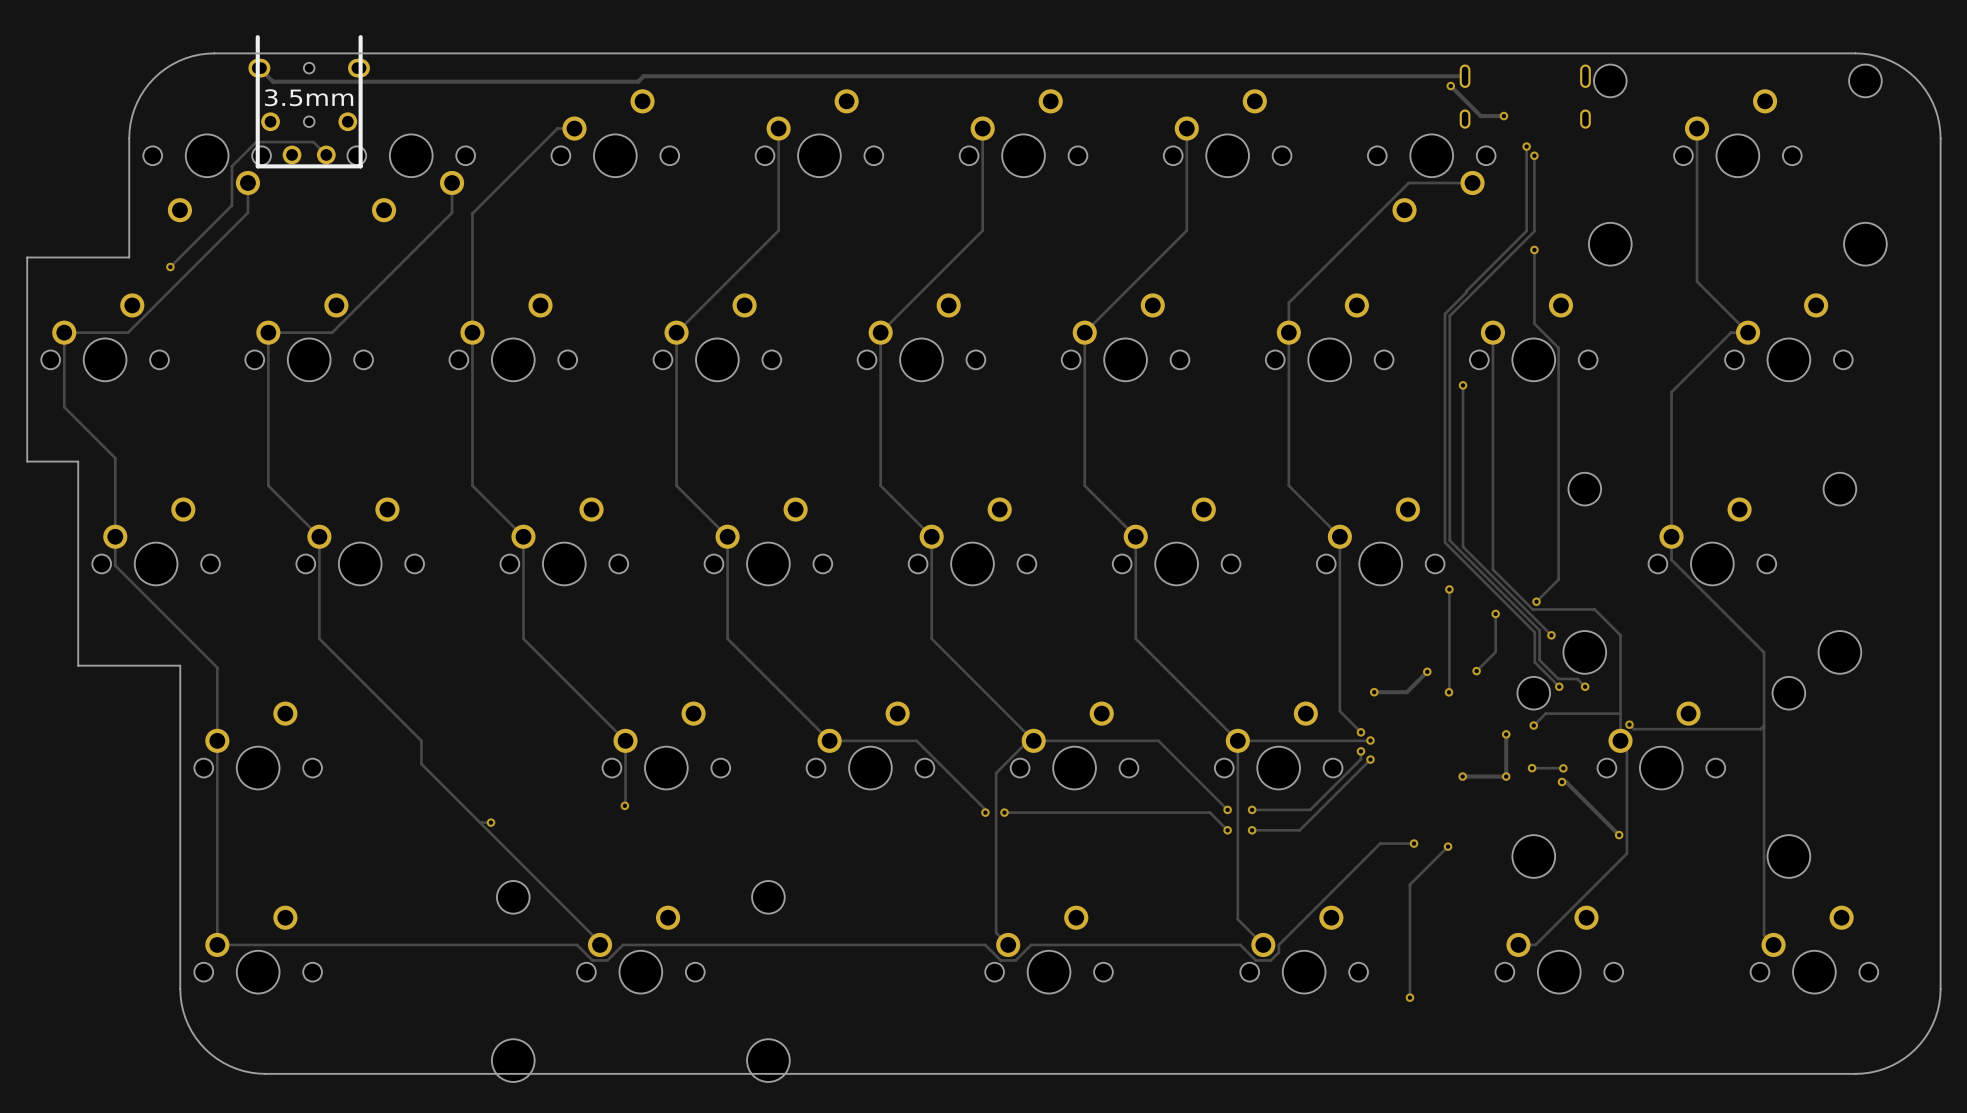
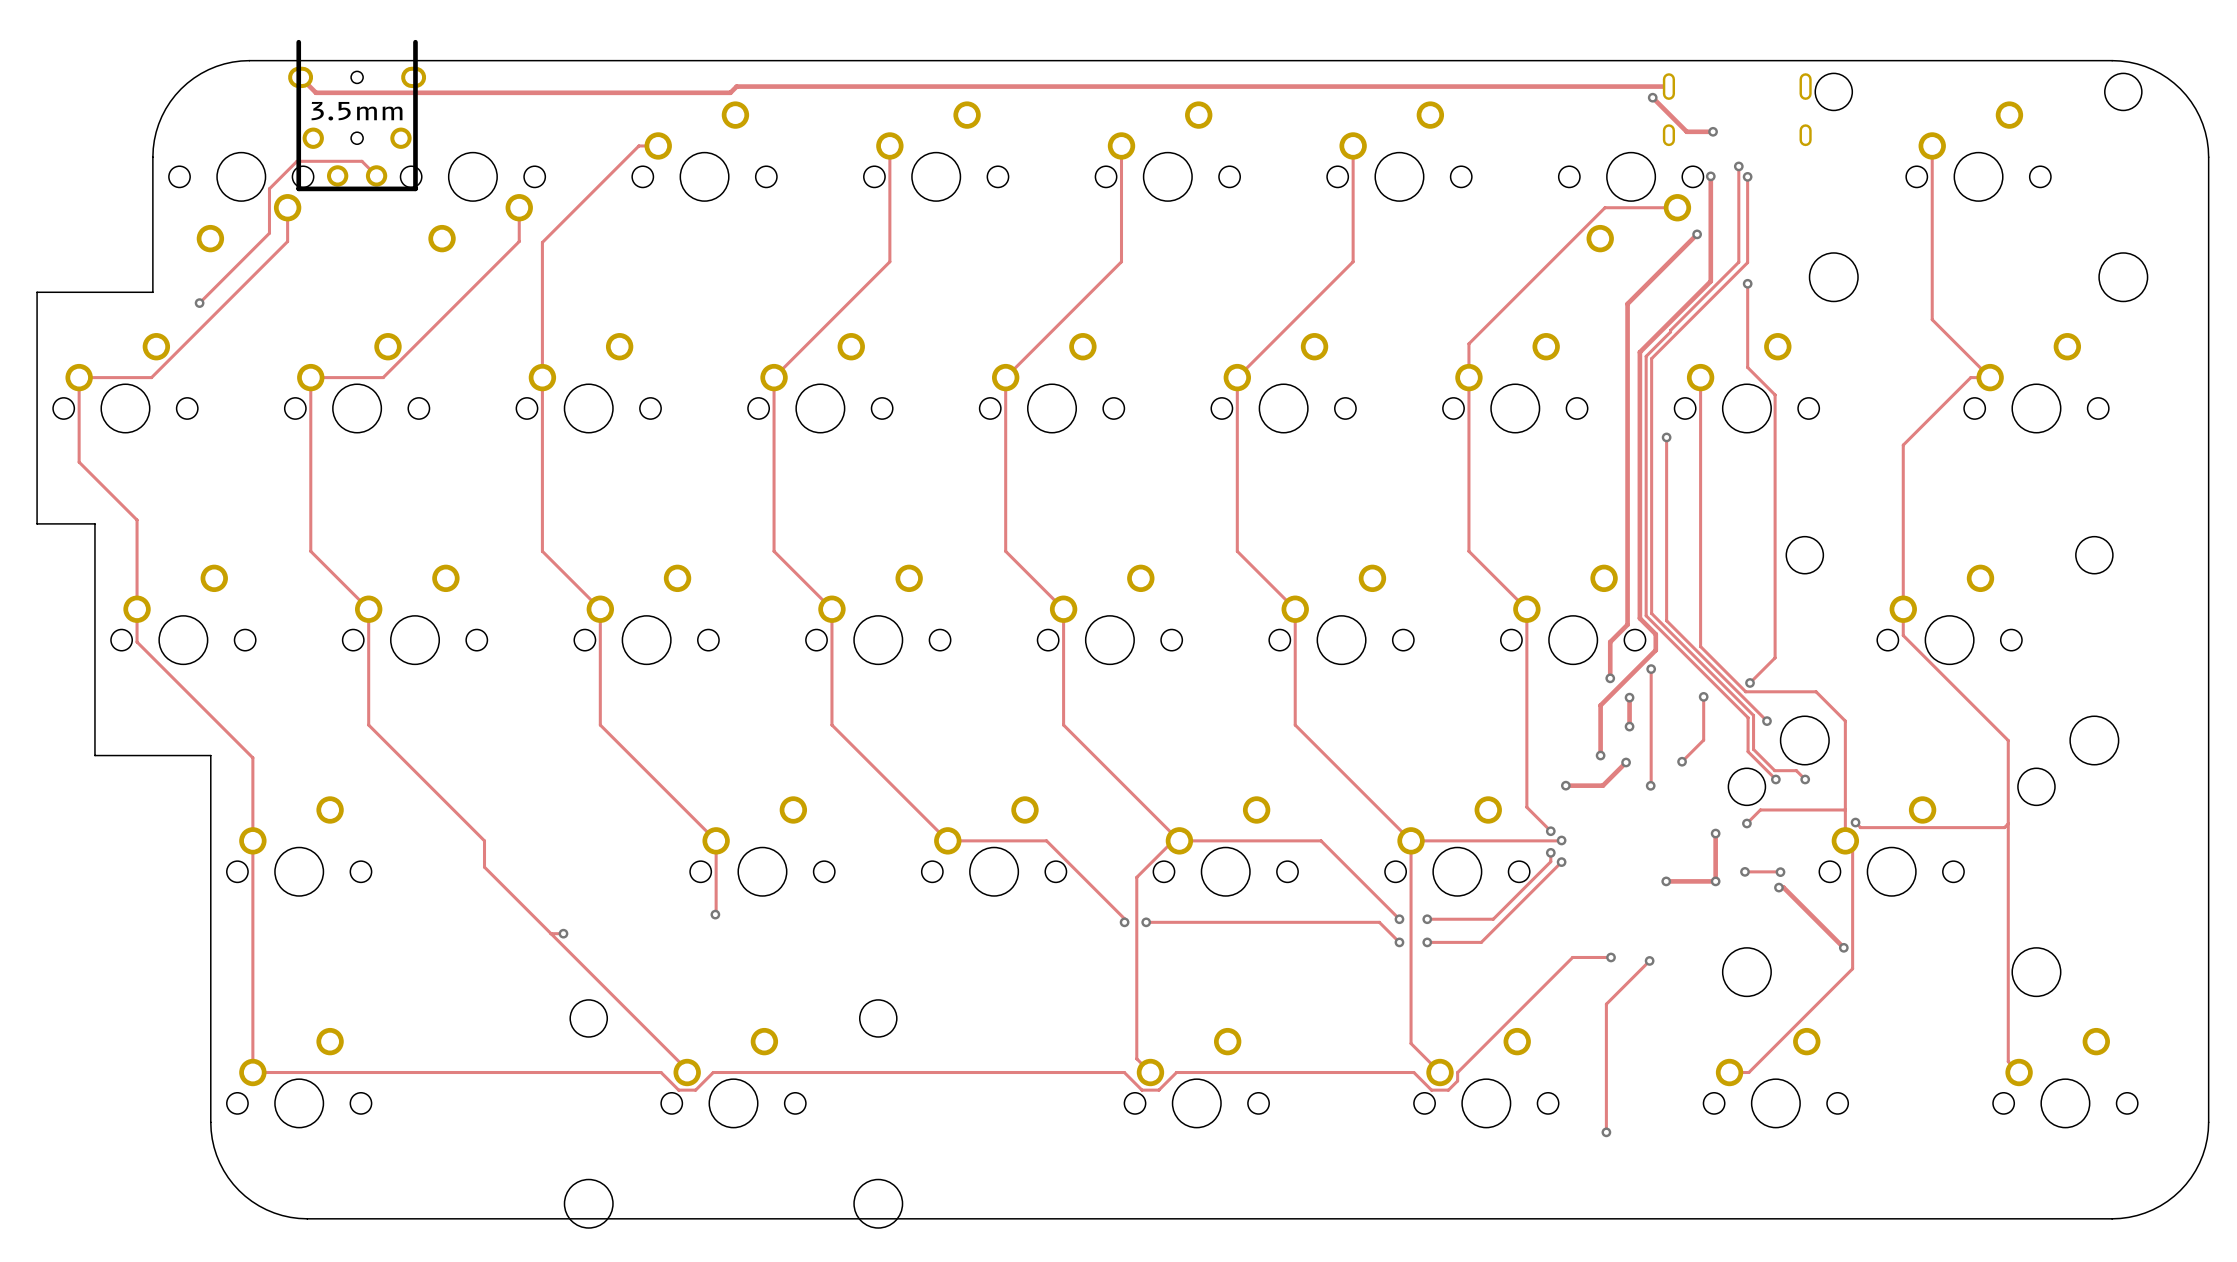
track: none -> (1710, 176) (1710, 281) (1639, 352) (1639, 618) (1655, 634) (1655, 650) (1600, 705) (1600, 755)
via: none -> (1710, 176)
track: none -> (1697, 234) (1627, 303) (1627, 624) (1610, 642) (1610, 678)
via: none -> (1697, 234)
via: none -> (1610, 678)
track: none -> (1629, 697) (1629, 726)
via: none -> (1629, 697)
via: none -> (1629, 726)
via: none -> (1600, 755)

